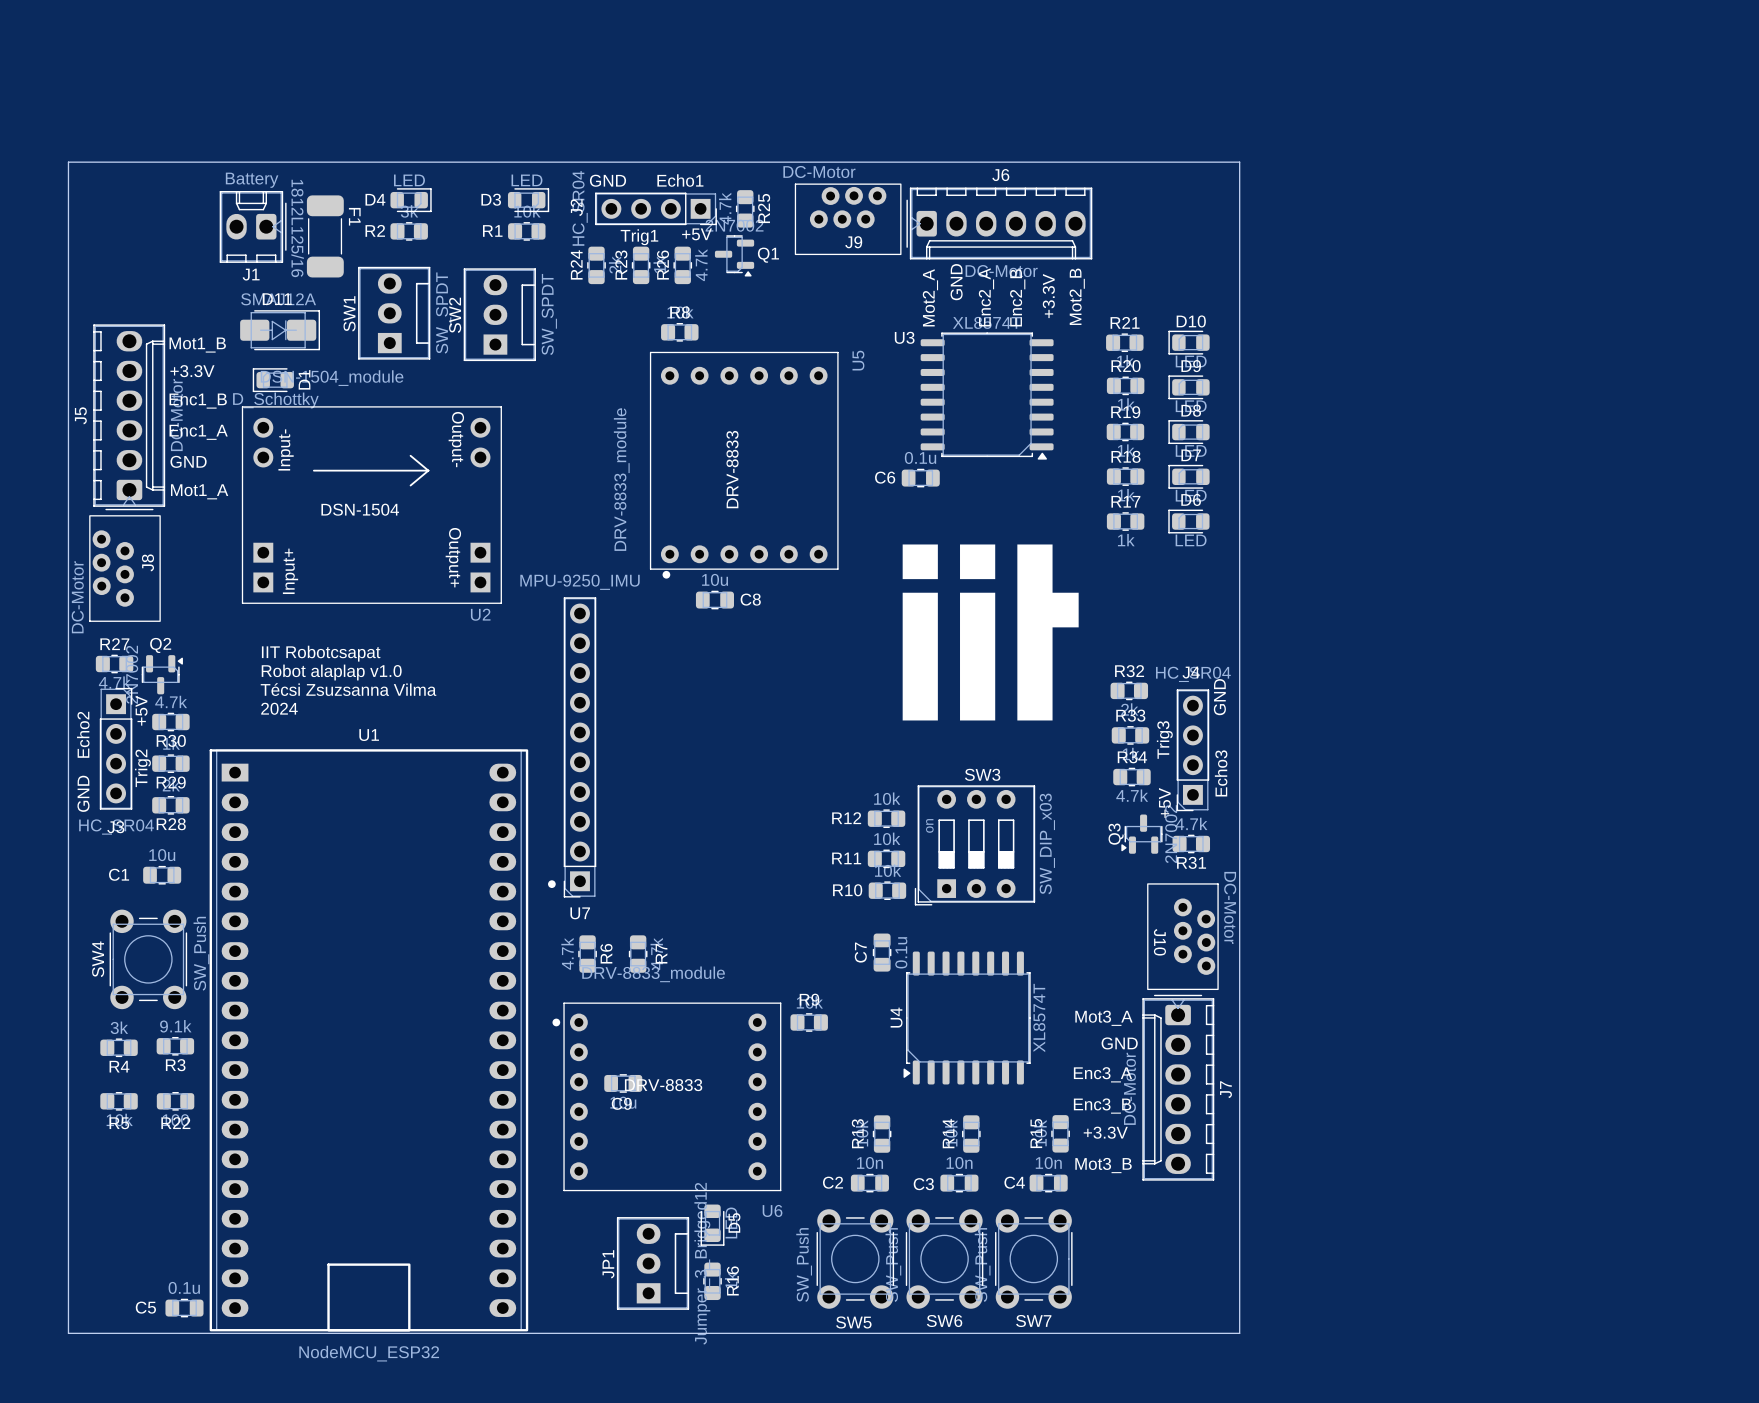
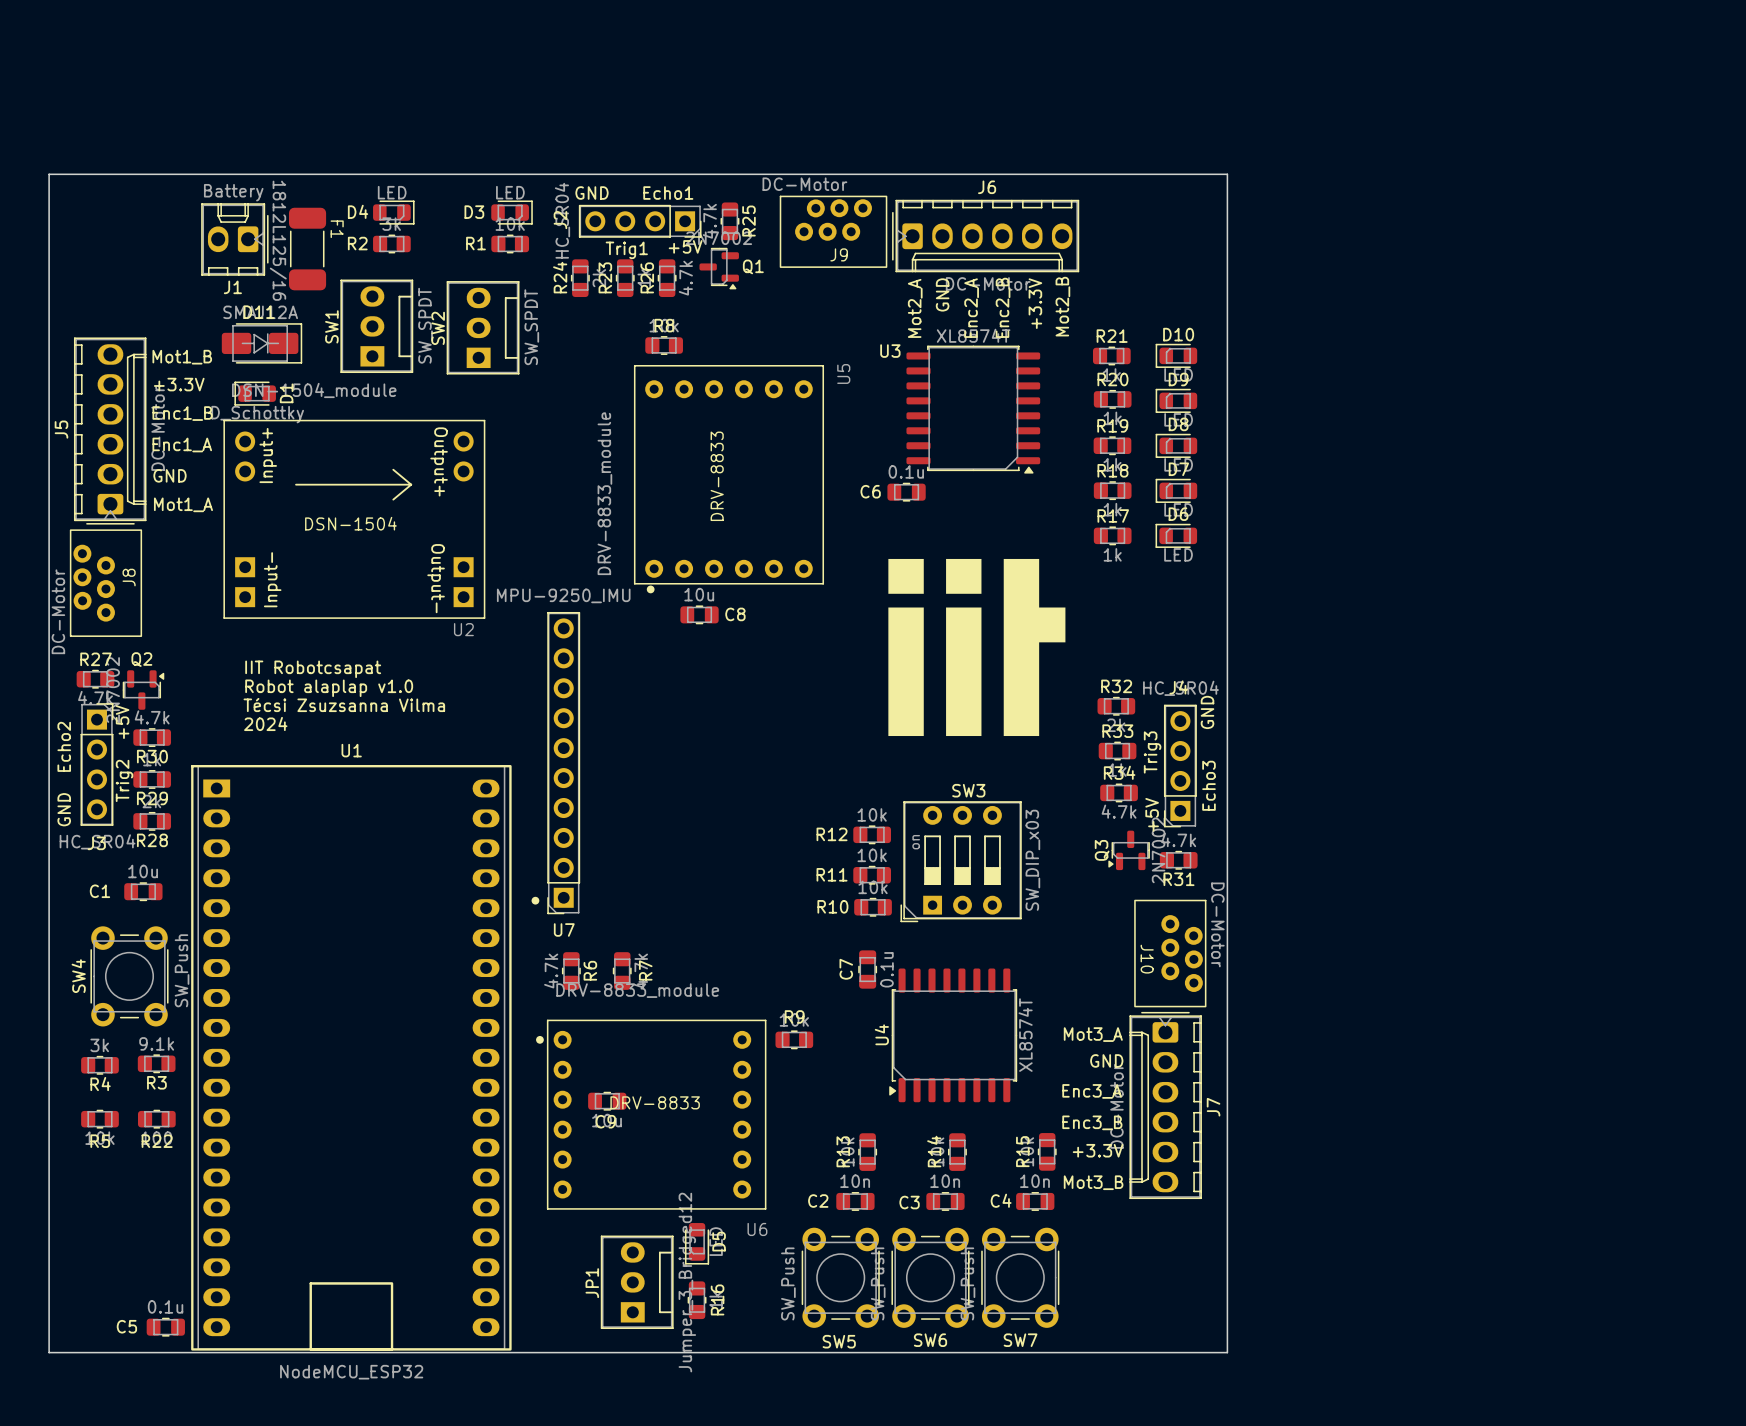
text: Output- (456, 439) -> Output+ (439, 461)
text: Input- (286, 449) -> Input+ (268, 455)
text: Output+ (453, 557) -> Output- (436, 578)
text: Input+ (290, 571) -> Input- (272, 579)

